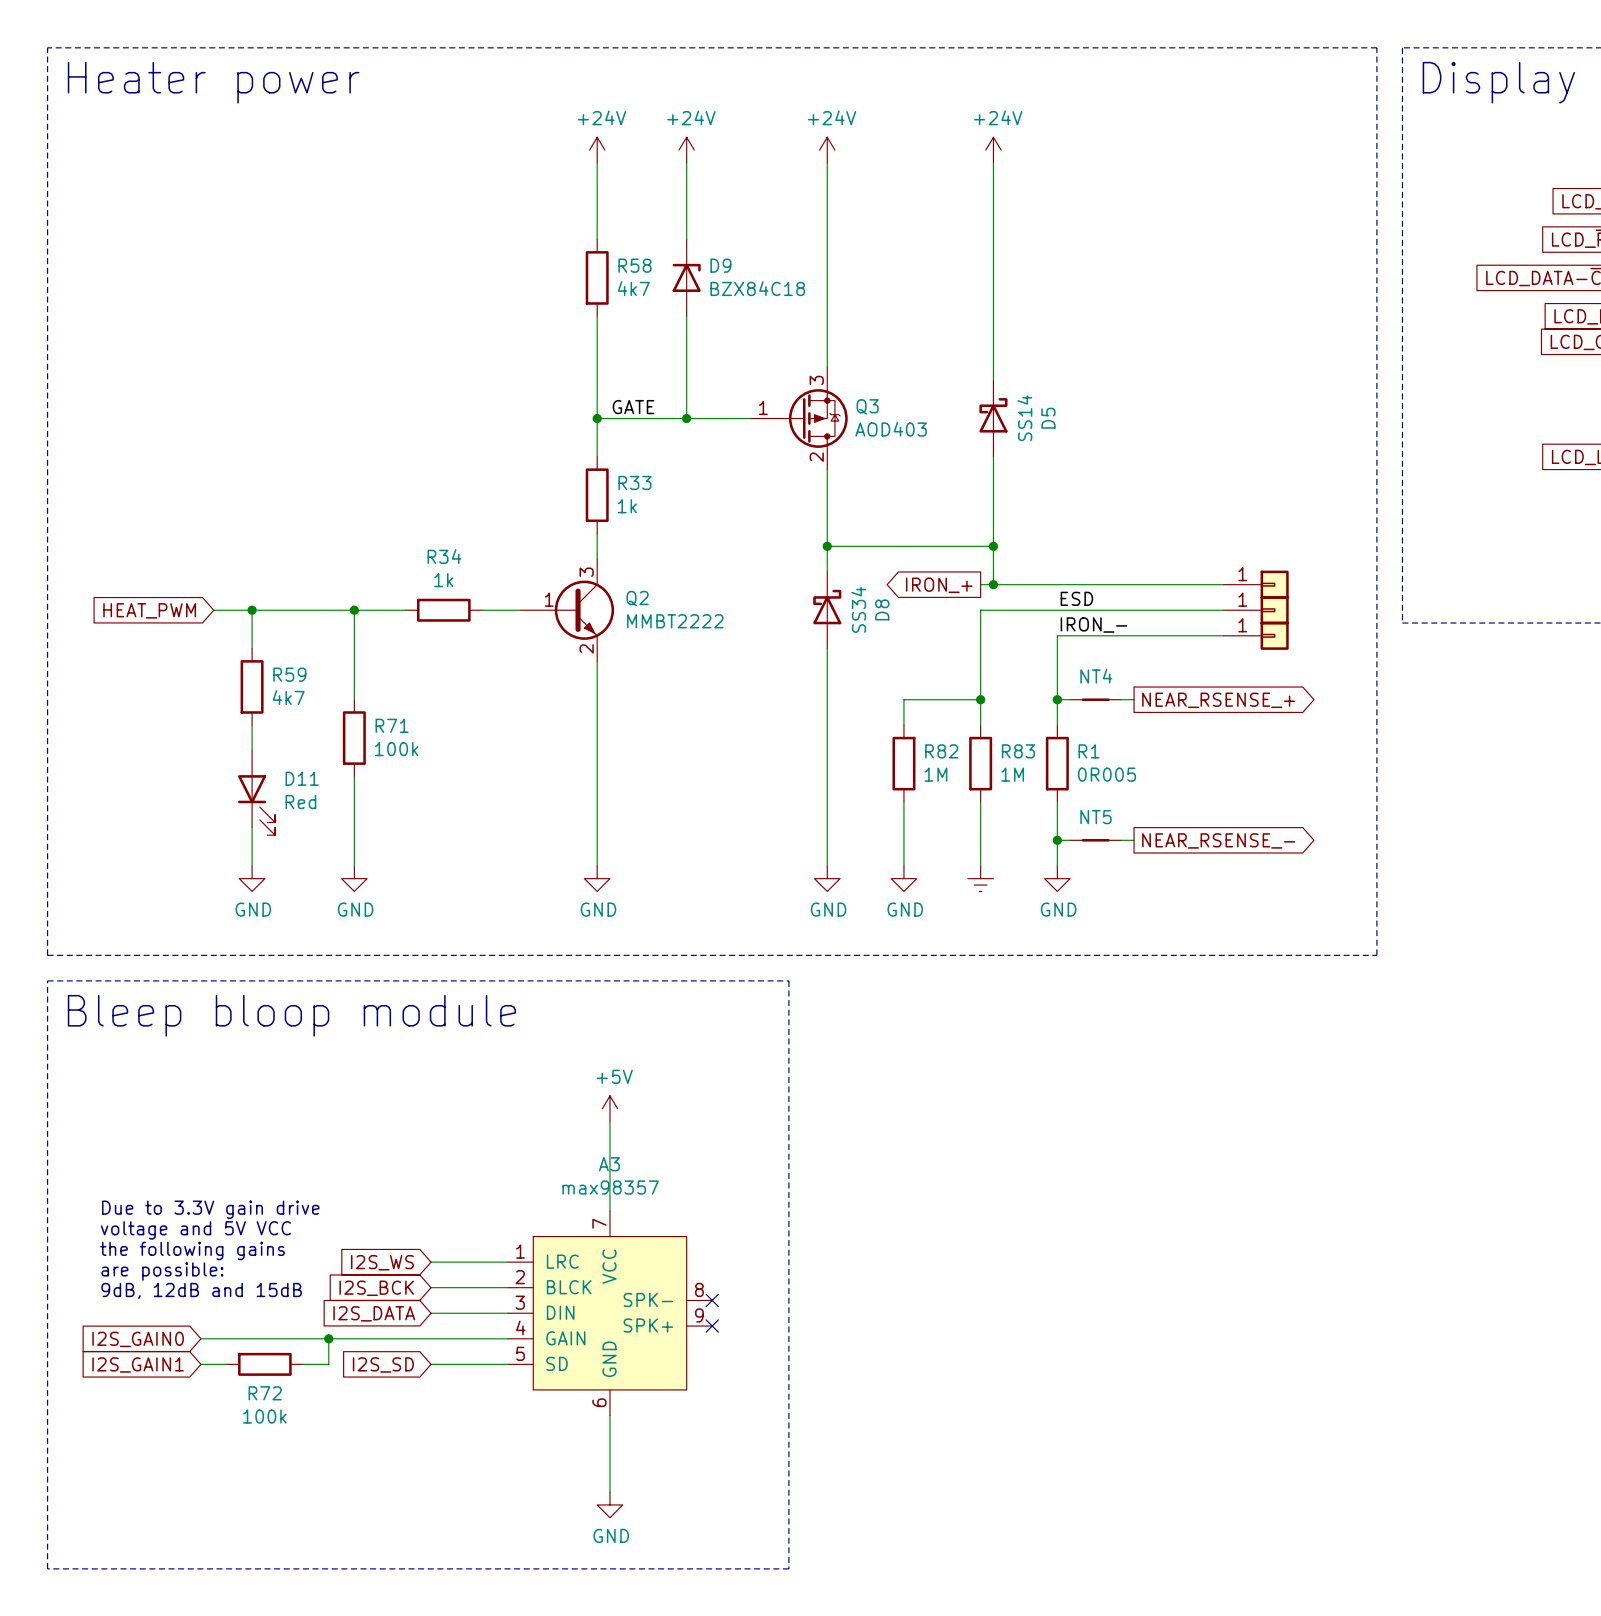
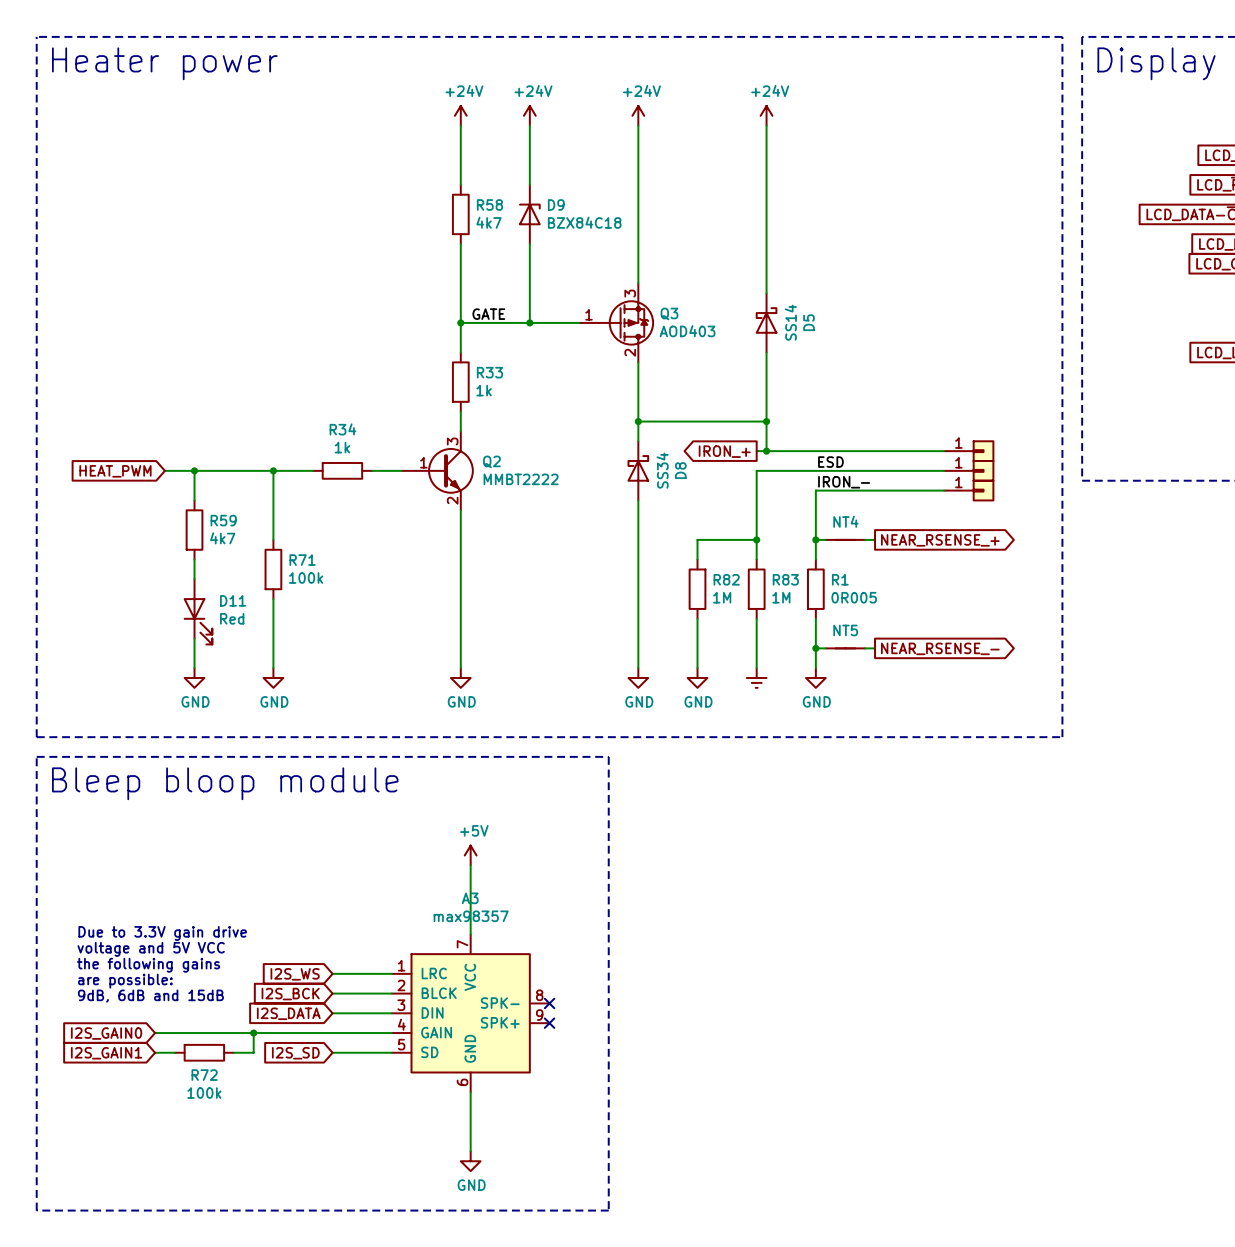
text: 9dB, 12dB and 15dB (201, 1290) -> 9dB, 6dB and 15dB (150, 996)

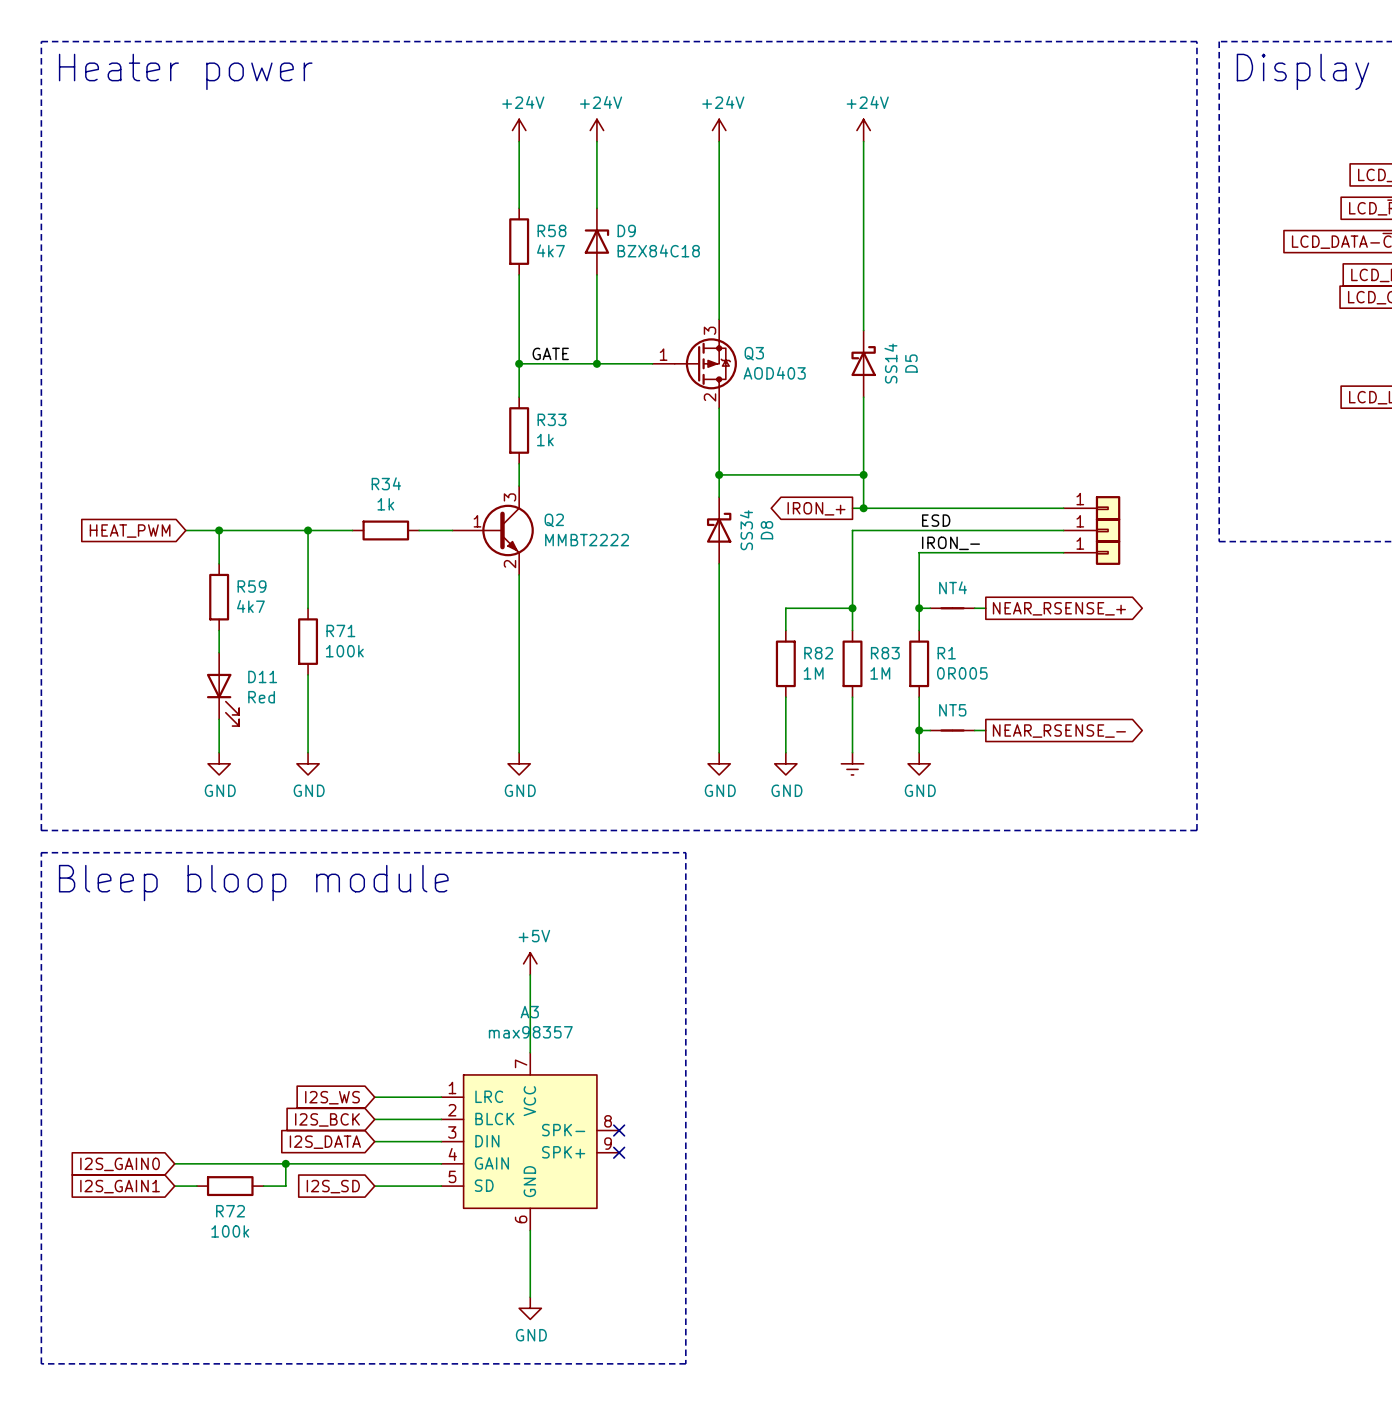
text: Due to 3.3V gain drive (162, 933) -> none
text: voltage and 5V VCC (151, 949) -> none
text: the following gains (148, 965) -> none
text: are possible: (125, 981) -> none
text: 9dB, 6dB and 15dB (150, 996) -> none

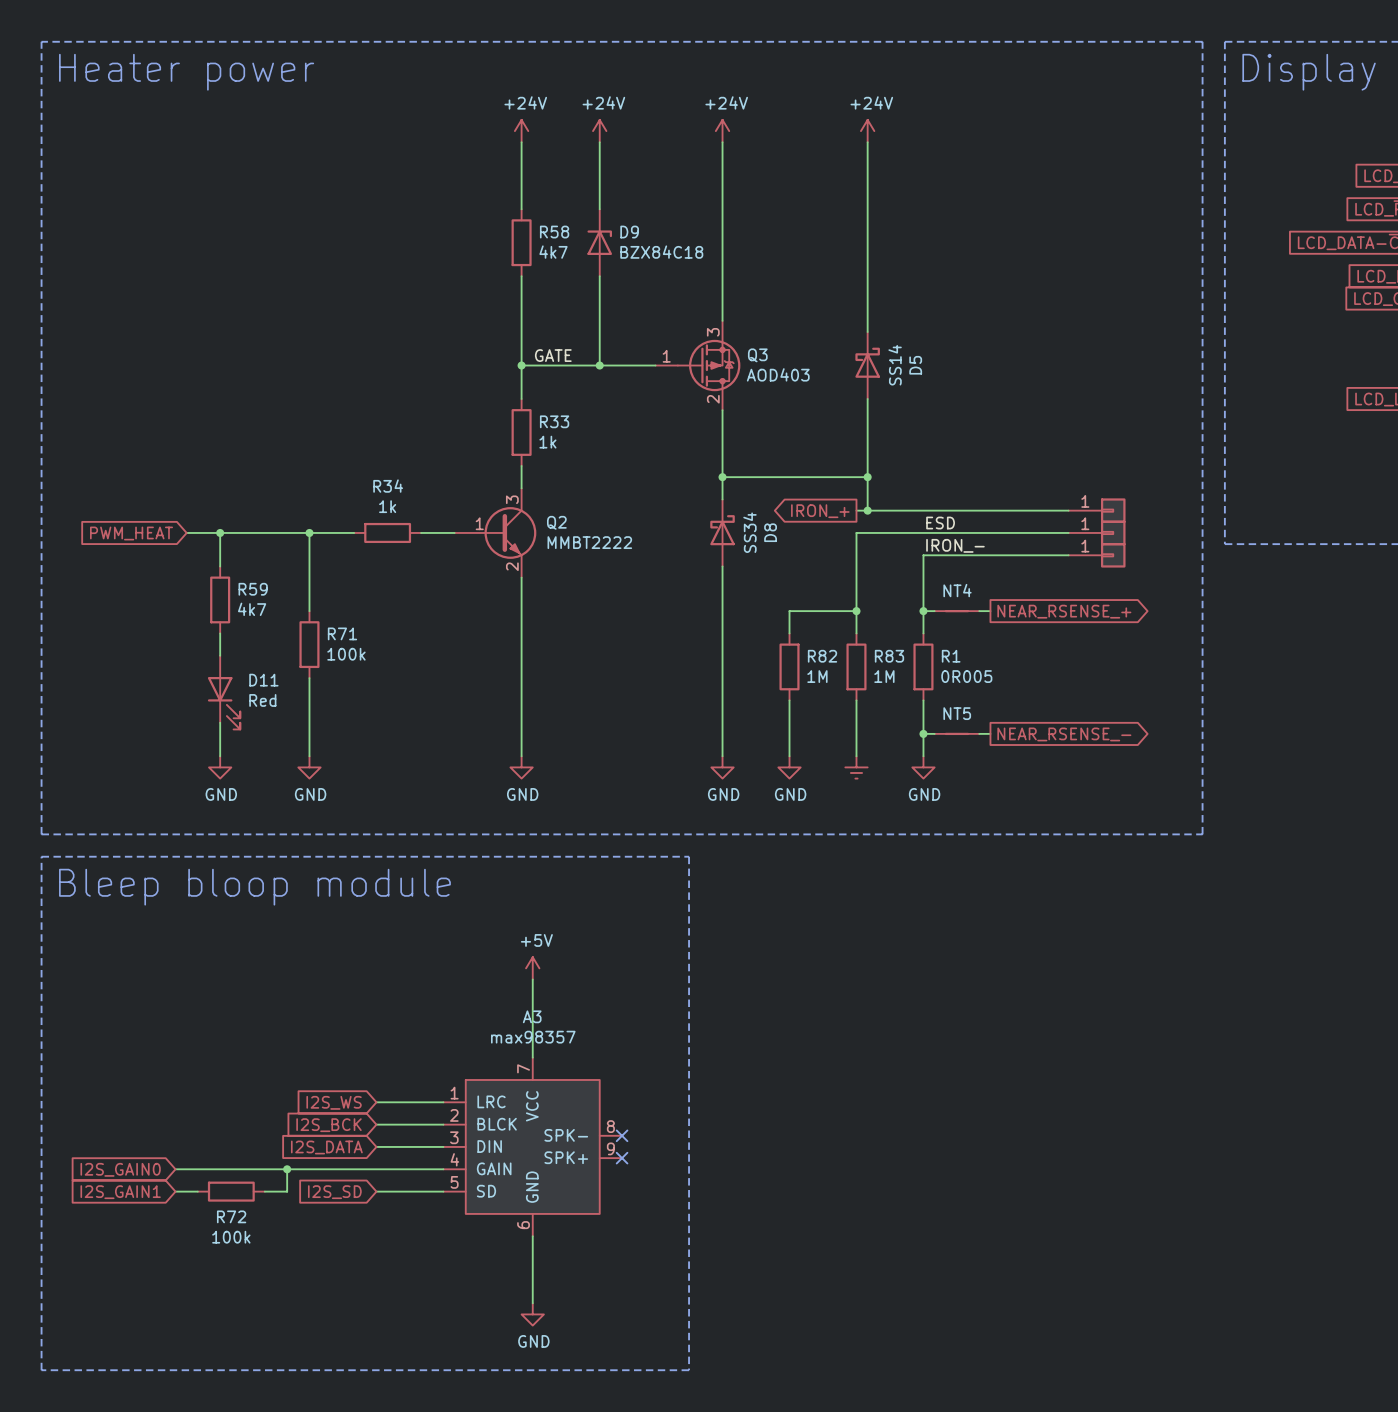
global label: HEAT_PWM (130, 531) -> PWM_HEAT (131, 533)

